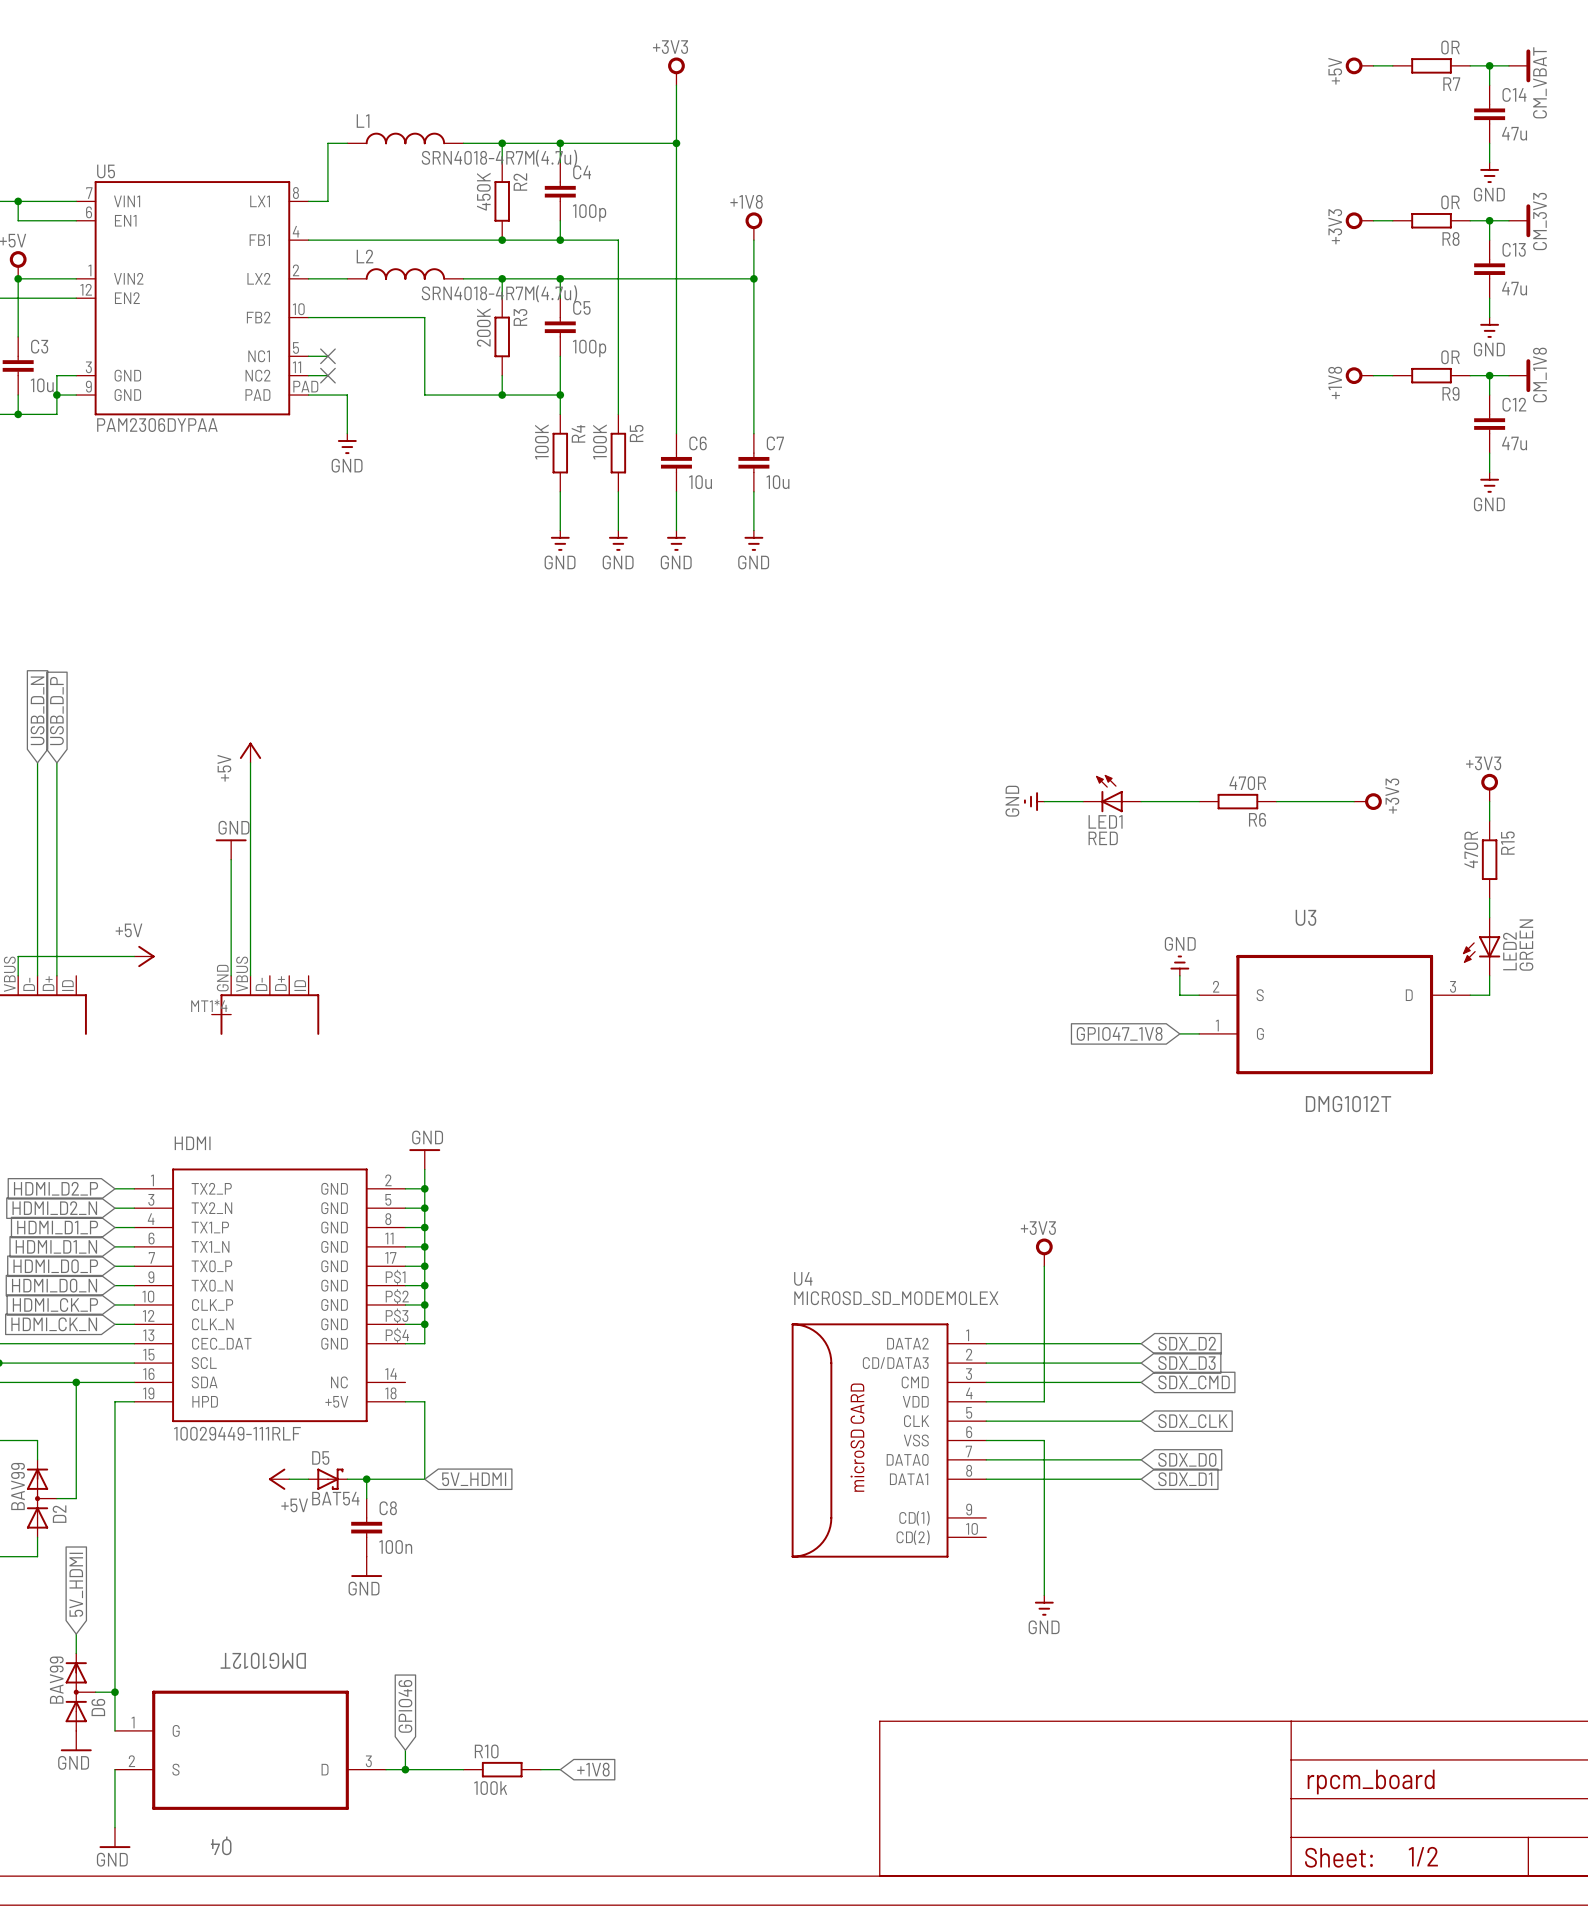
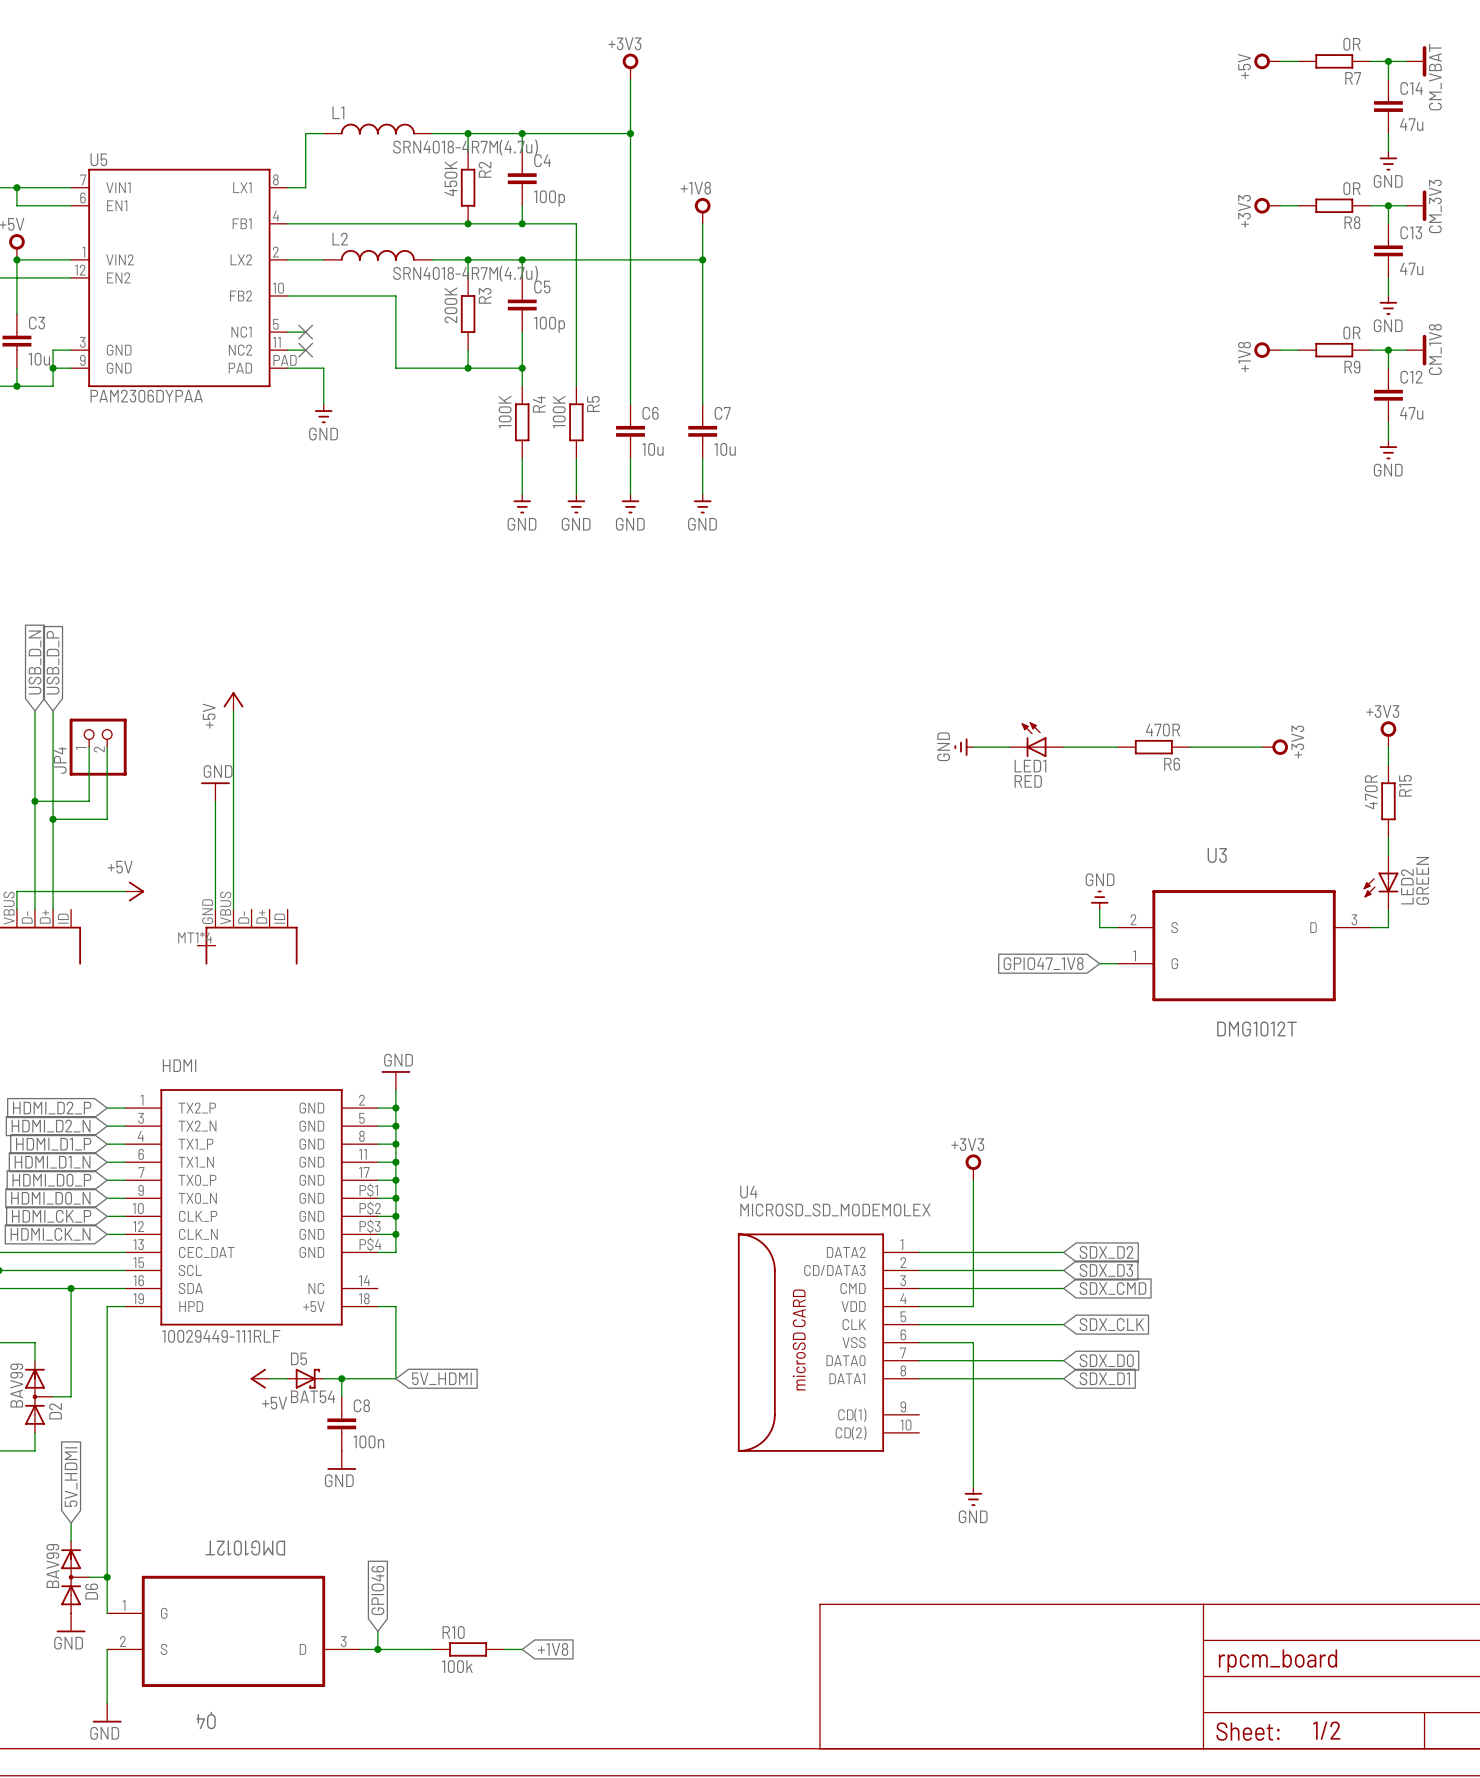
wire: none -> (89, 747) (89, 801) (34, 801)
JP4: none -> (98, 747)
wire: none -> (107, 747) (107, 819) (53, 819)
junction: none -> (34, 801)
junction: none -> (53, 819)

